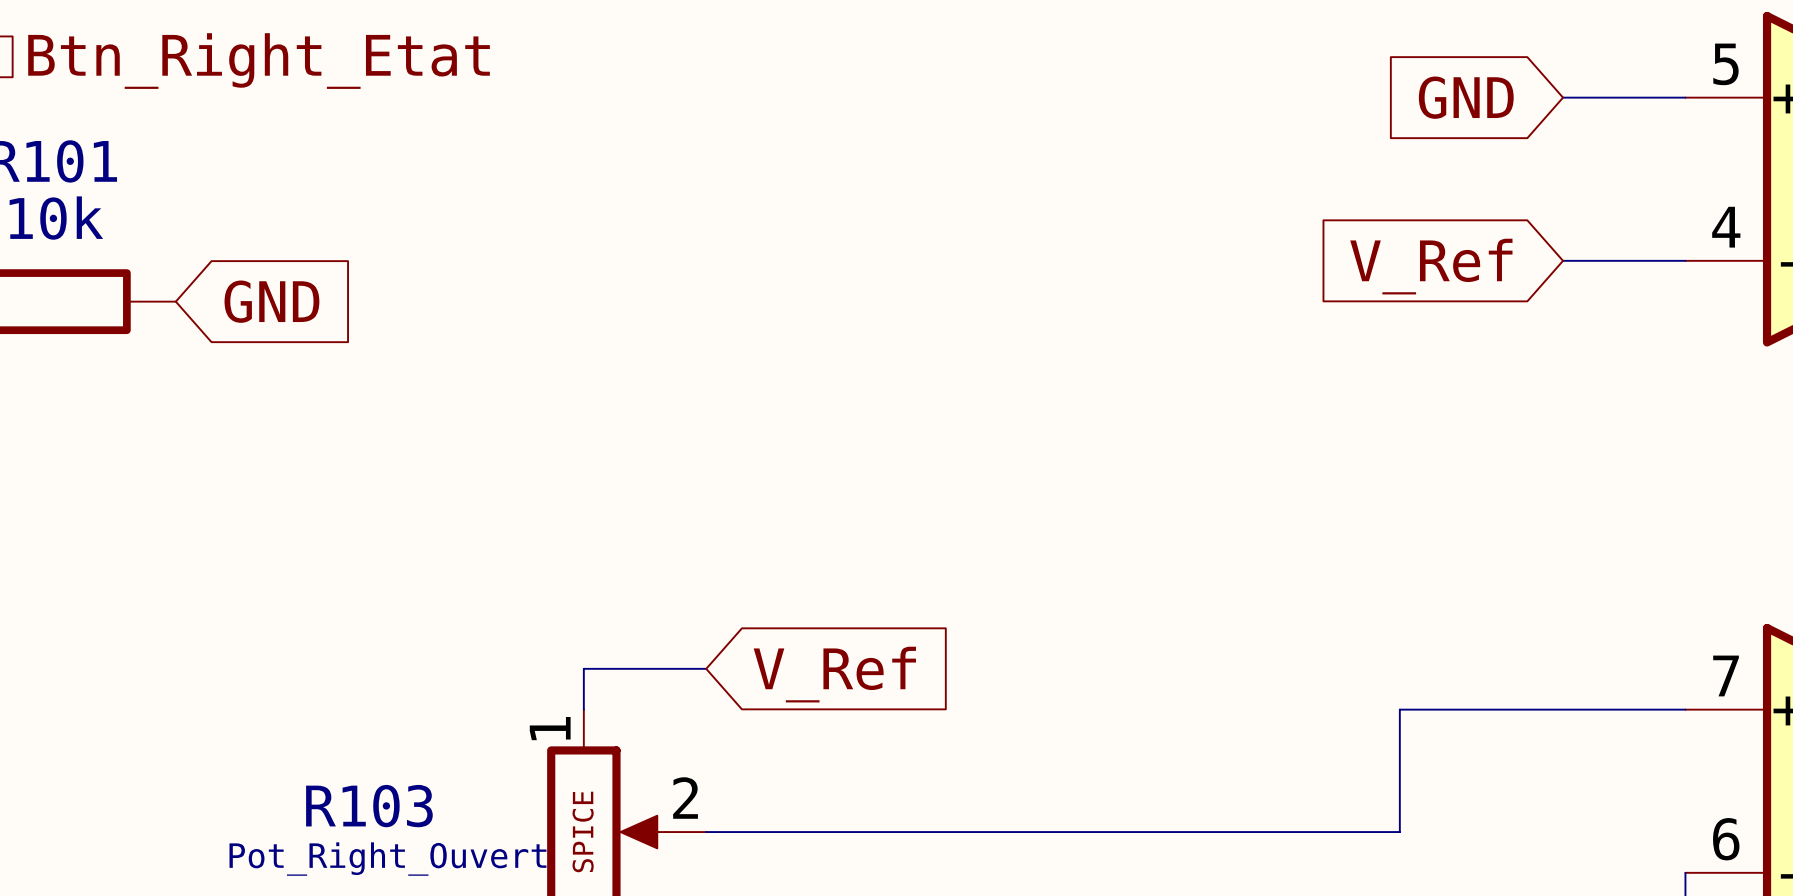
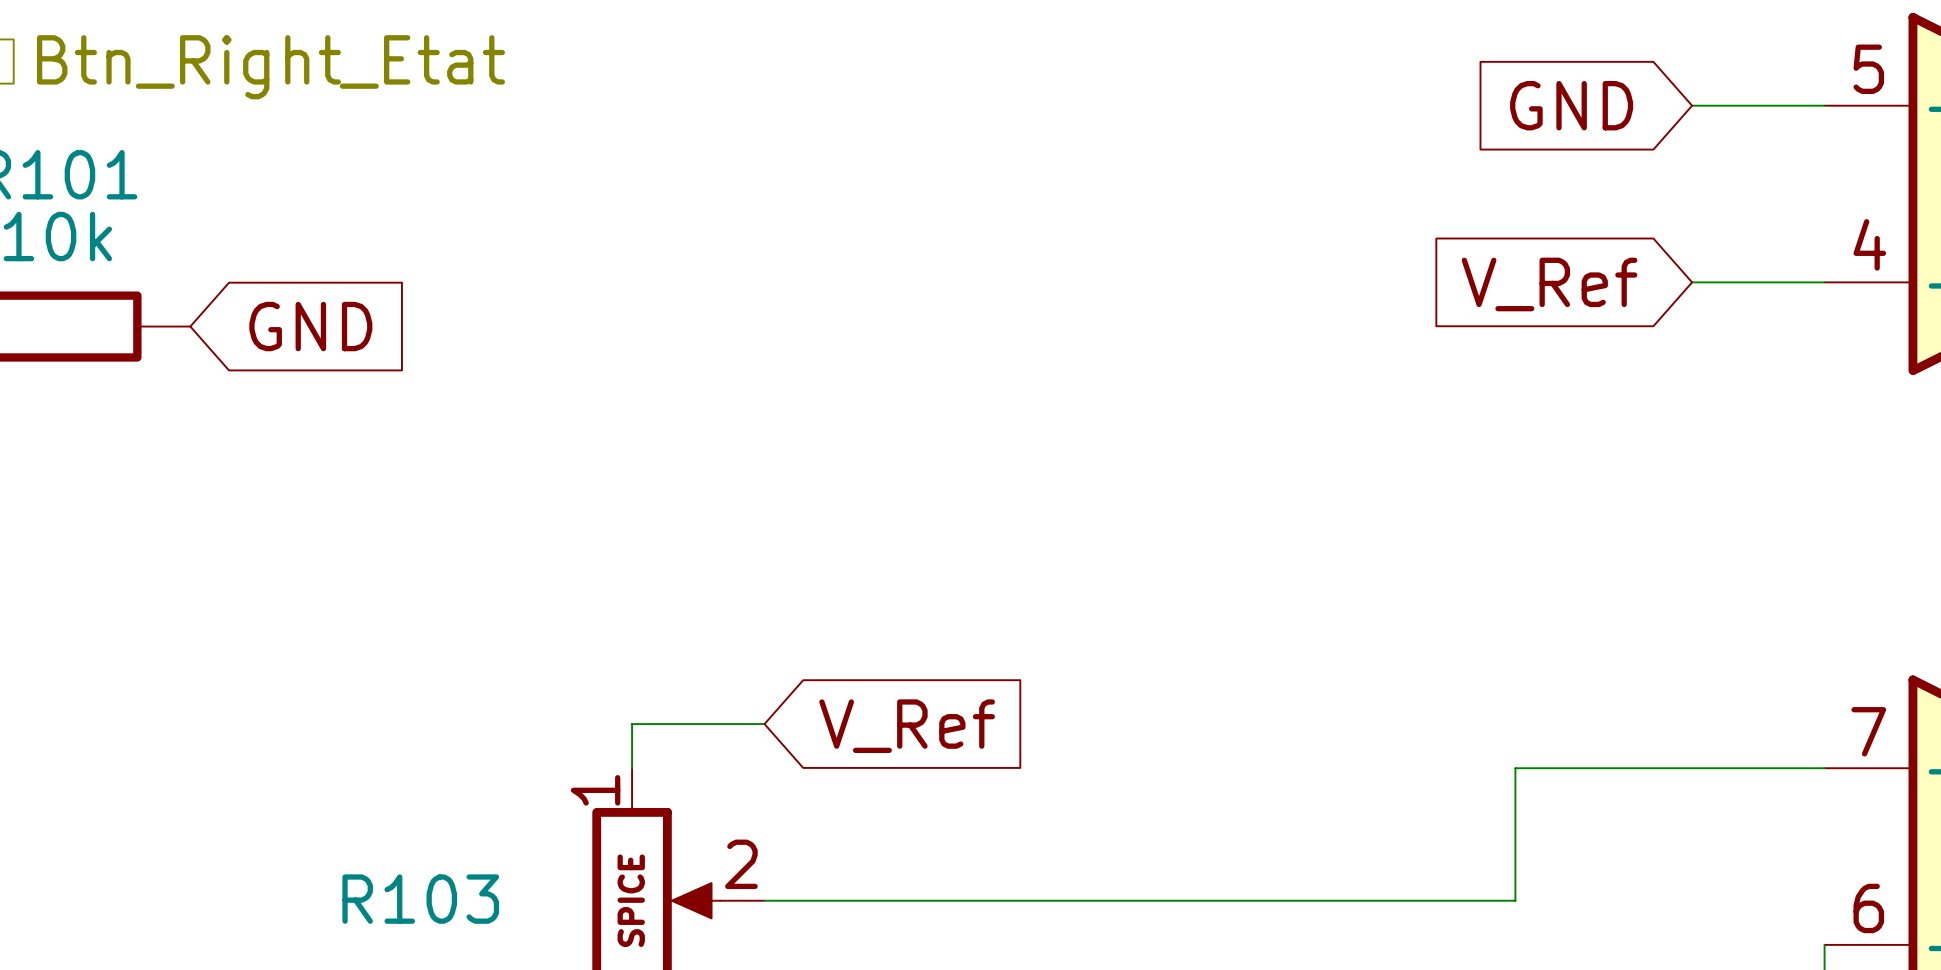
R103 name position: R103 (369, 806) -> R103 (420, 899)
R103 text: Pot_Right_Ouvert (387, 859) -> none

